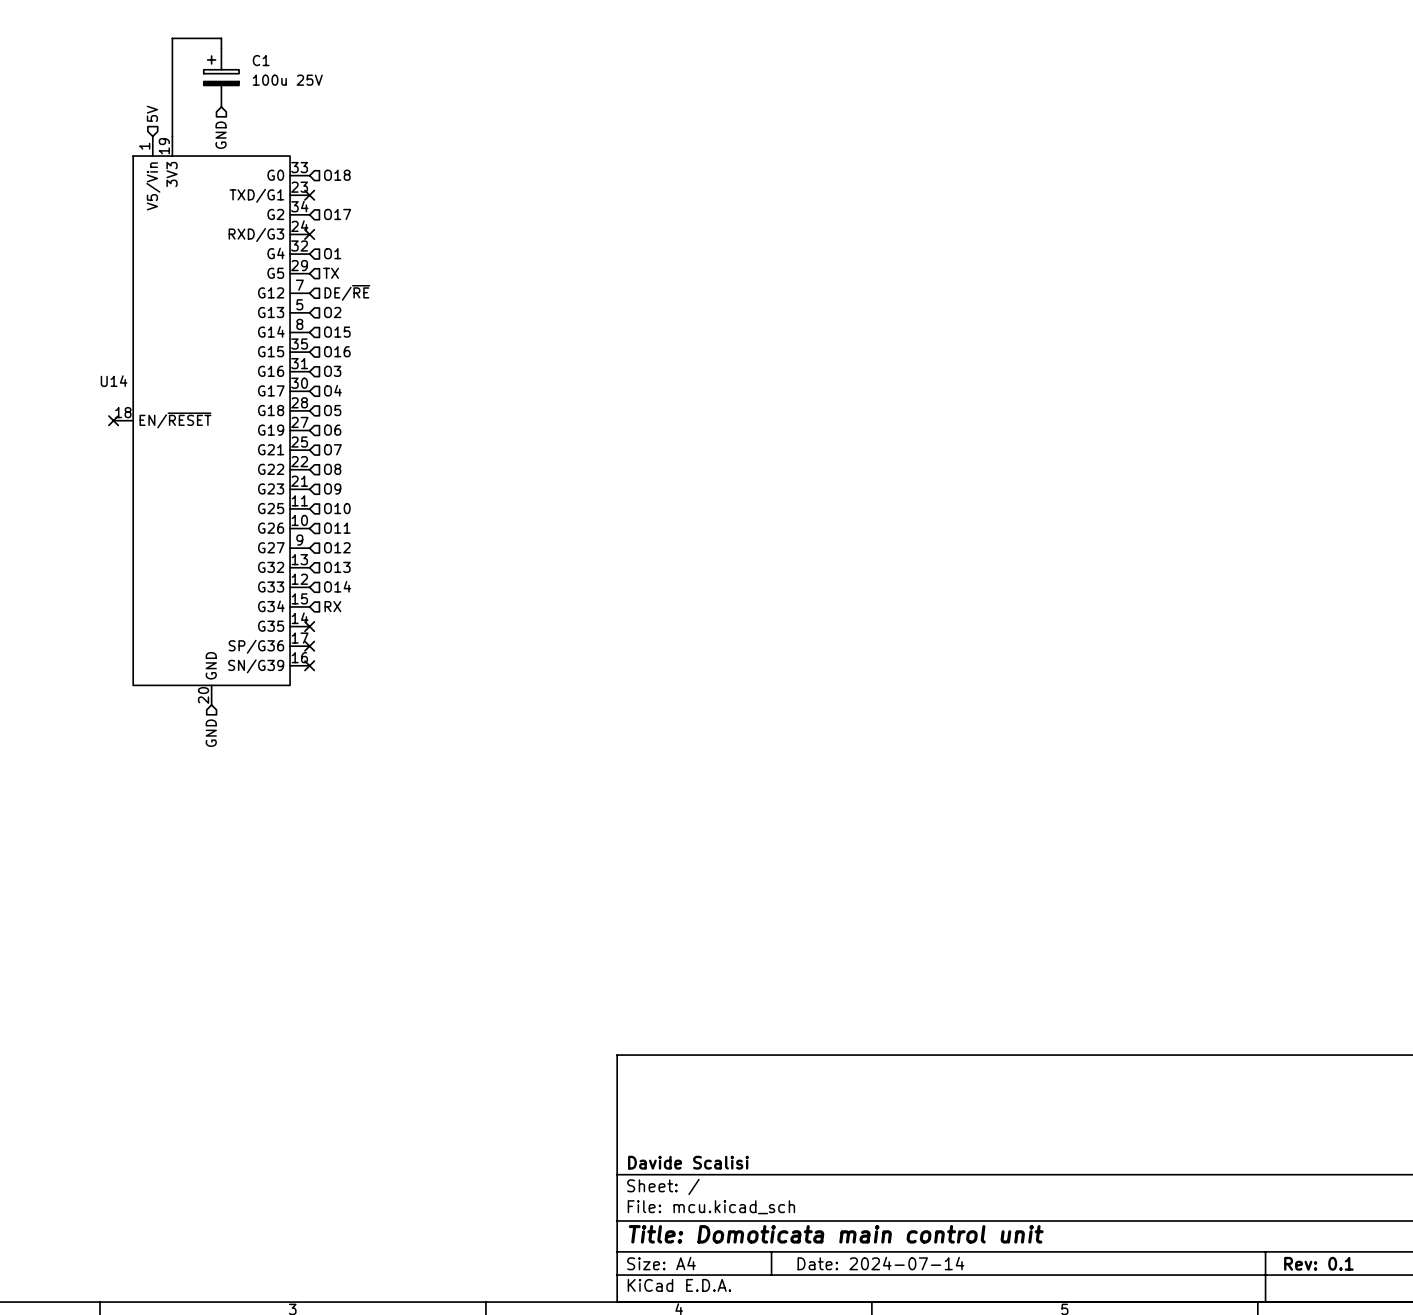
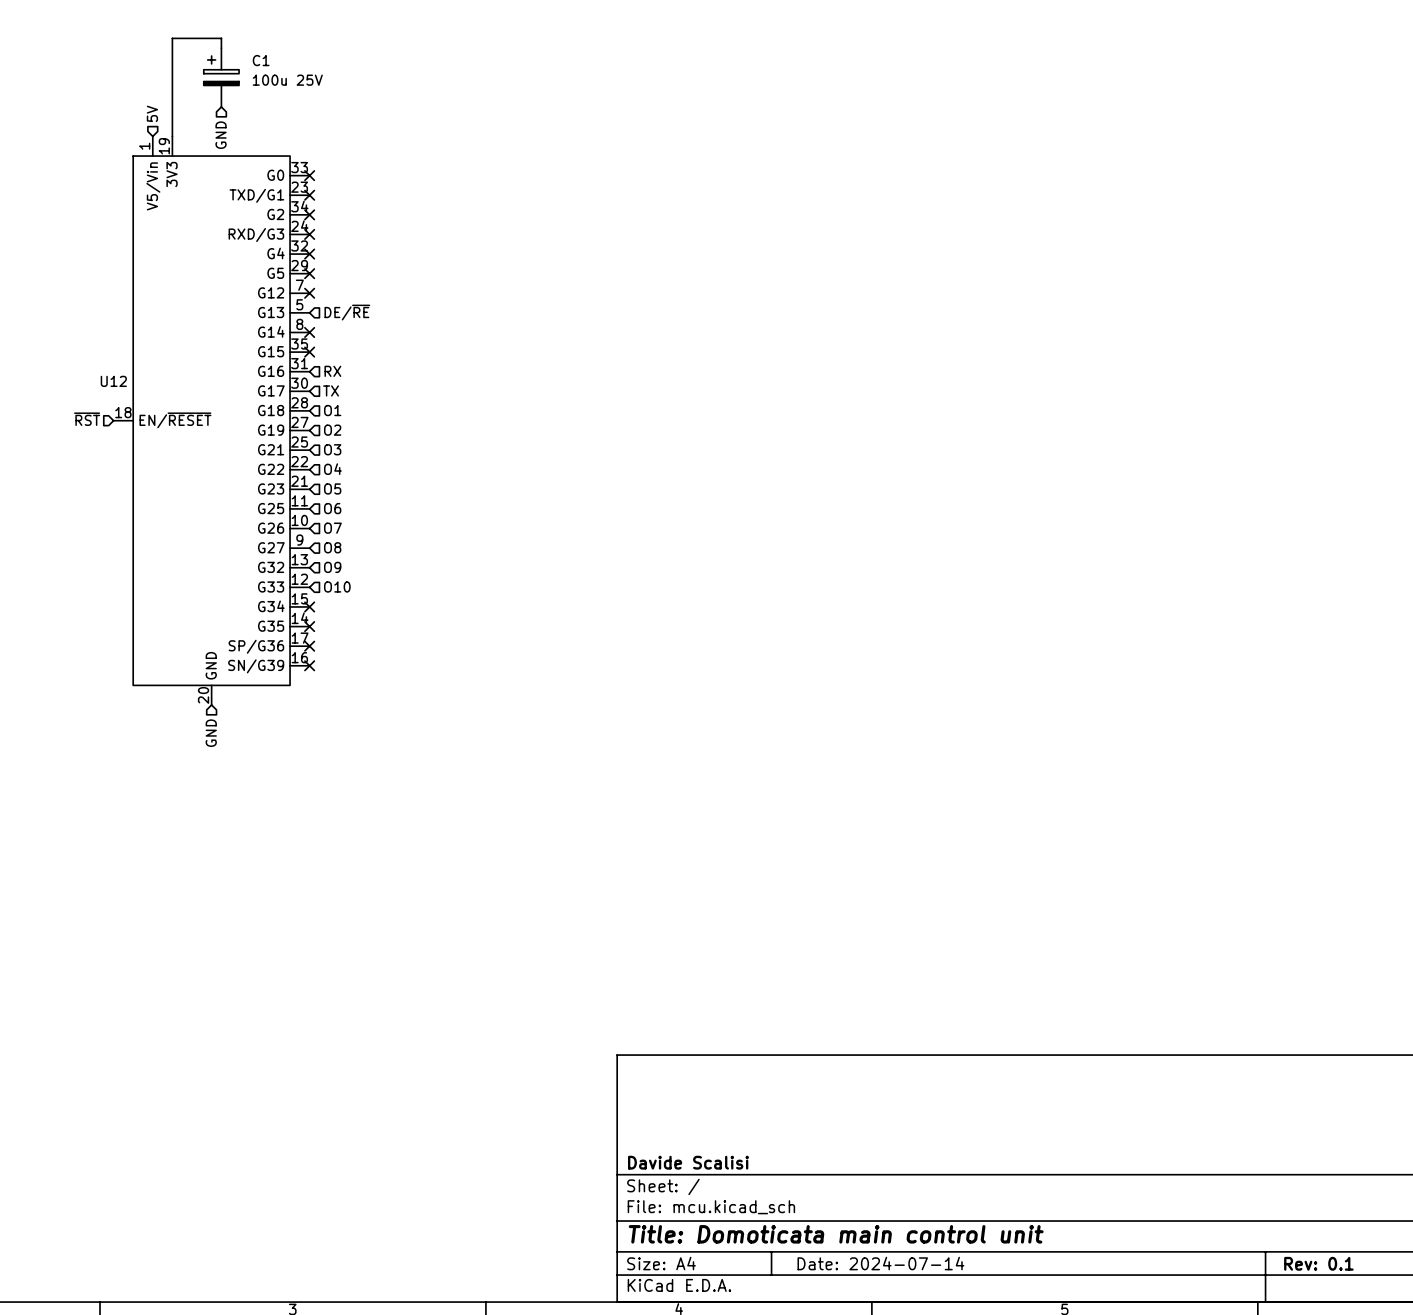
no-connect mark: none -> (309, 175)
hierarchical label: O18 (337, 175) -> none
no-connect mark: none -> (309, 214)
hierarchical label: O17 (337, 214) -> none
hierarchical label: O1 (332, 253) -> none
no-connect mark: none -> (309, 254)
no-connect mark: none -> (309, 273)
hierarchical label: TX (331, 273) -> none
hierarchical label: DE/~{RE} (347, 292) -> none
no-connect mark: none -> (309, 293)
hierarchical label: O2 (332, 312) -> DE/~{RE} (347, 312)
no-connect mark: none -> (309, 332)
hierarchical label: O15 (337, 332) -> none
hierarchical label: O16 (337, 351) -> none
no-connect mark: none -> (309, 352)
hierarchical label: O3 (332, 371) -> RX (332, 371)
U14 name: U14 (114, 381) -> U12 (113, 381)
hierarchical label: O4 (332, 390) -> TX (331, 390)
hierarchical label: O5 (332, 410) -> O1 (332, 410)
hierarchical label: none -> ~{RST} (87, 419)
no-connect mark: (113, 420) -> none
hierarchical label: O6 (332, 430) -> O2 (332, 430)
hierarchical label: O7 (332, 449) -> O3 (332, 449)
hierarchical label: O8 (332, 469) -> O4 (332, 469)
hierarchical label: O9 (332, 488) -> O5 (332, 488)
hierarchical label: O10 (337, 508) -> O6 (332, 508)
hierarchical label: O11 (337, 528) -> O7 (332, 528)
hierarchical label: O12 (337, 547) -> O8 (332, 547)
hierarchical label: O13 (337, 567) -> O9 (332, 567)
hierarchical label: O14 (337, 586) -> O10 (337, 586)
no-connect mark: none -> (309, 606)
hierarchical label: RX (332, 606) -> none

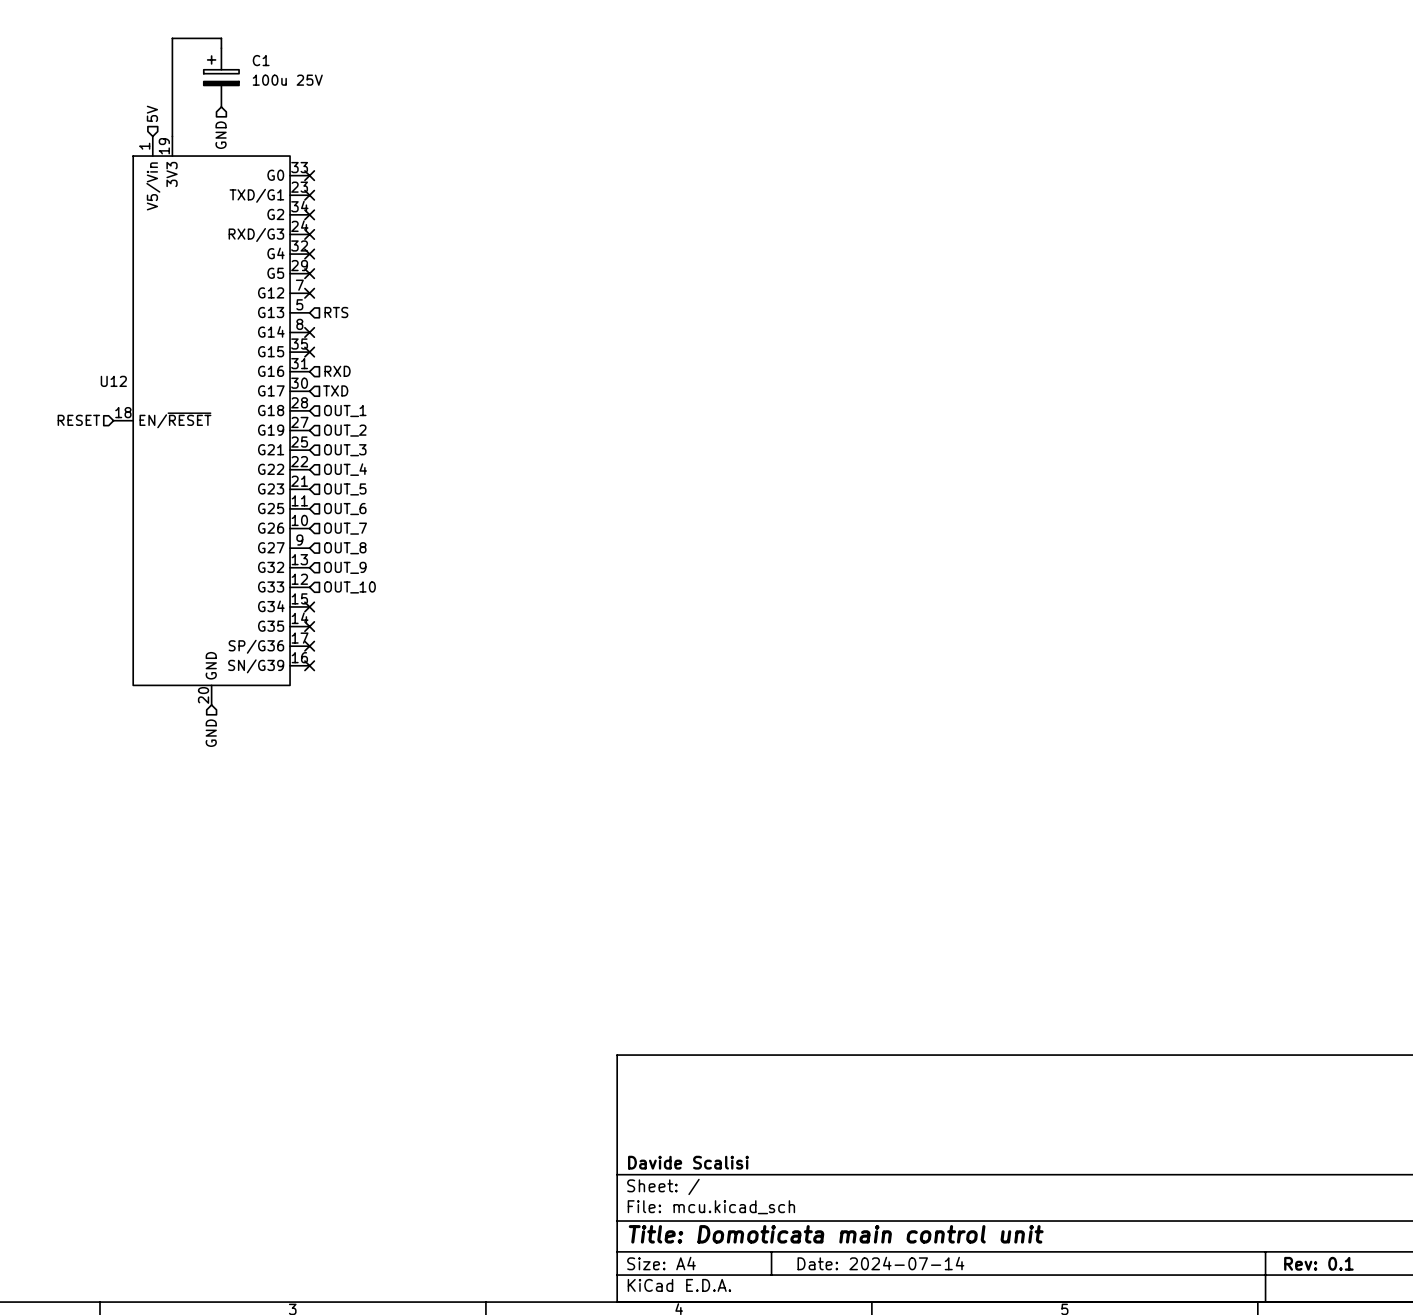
hierarchical label: DE/~{RE} (347, 312) -> RTS (336, 312)
hierarchical label: RX (332, 371) -> RXD (337, 371)
hierarchical label: TX (331, 390) -> TXD (335, 390)
hierarchical label: O1 (332, 410) -> OUT_1 (345, 411)
hierarchical label: ~{RST} (87, 419) -> RESET (78, 420)
hierarchical label: O2 (332, 430) -> OUT_2 (345, 430)
hierarchical label: O3 (332, 449) -> OUT_3 (345, 450)
hierarchical label: O4 (332, 469) -> OUT_4 (345, 469)
hierarchical label: O5 (332, 488) -> OUT_5 (345, 489)
hierarchical label: O6 (332, 508) -> OUT_6 (345, 509)
hierarchical label: O7 (332, 528) -> OUT_7 (345, 528)
hierarchical label: O8 (332, 547) -> OUT_8 (345, 548)
hierarchical label: O9 (332, 567) -> OUT_9 (345, 567)
hierarchical label: O10 (337, 586) -> OUT_10 (349, 587)

